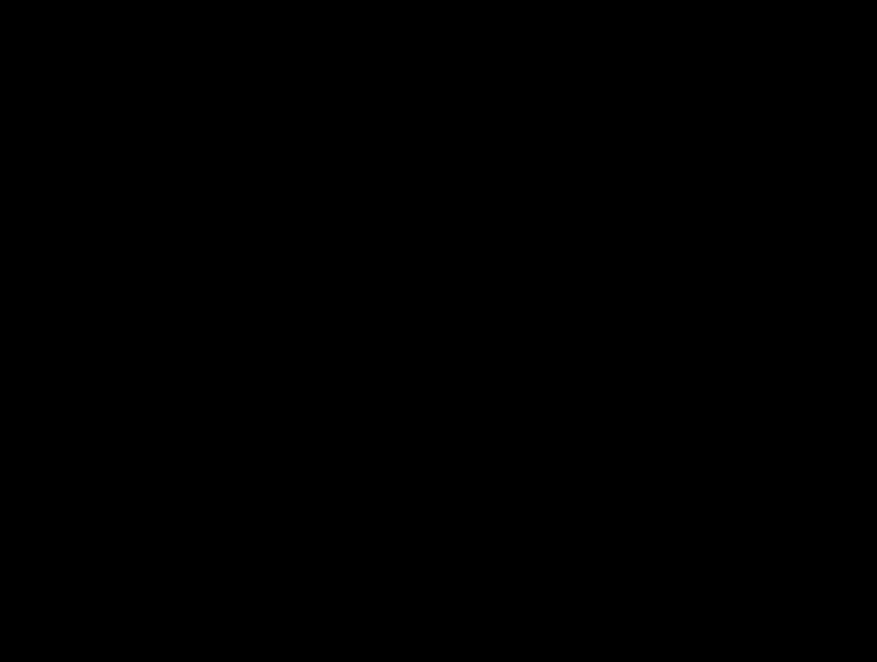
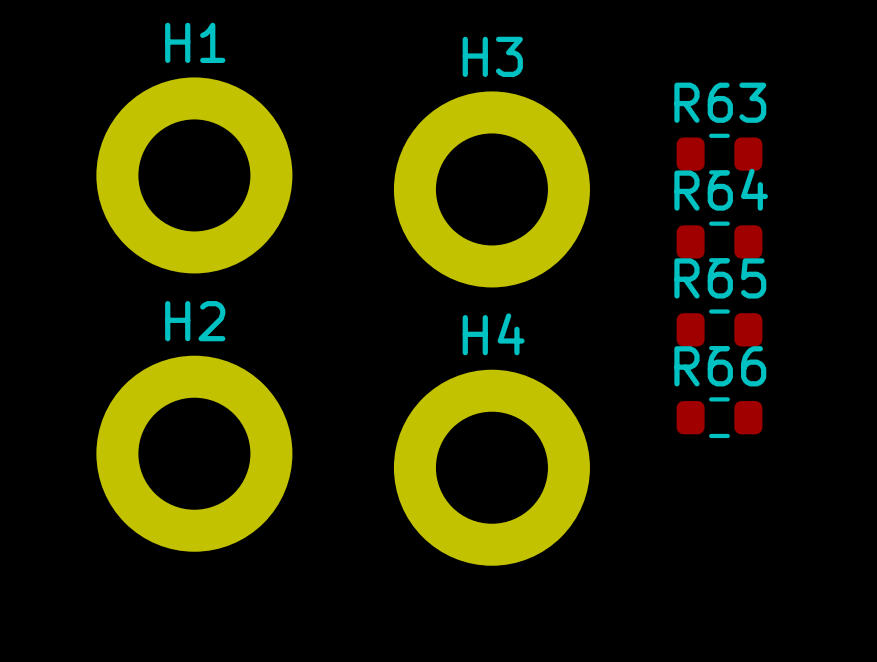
R63: none -> (719, 154)
H1: none -> (194, 175)
H3: none -> (491, 189)
R64: none -> (719, 241)
R65: none -> (719, 329)
R66: none -> (719, 417)
H2: none -> (194, 453)
H4: none -> (491, 467)

